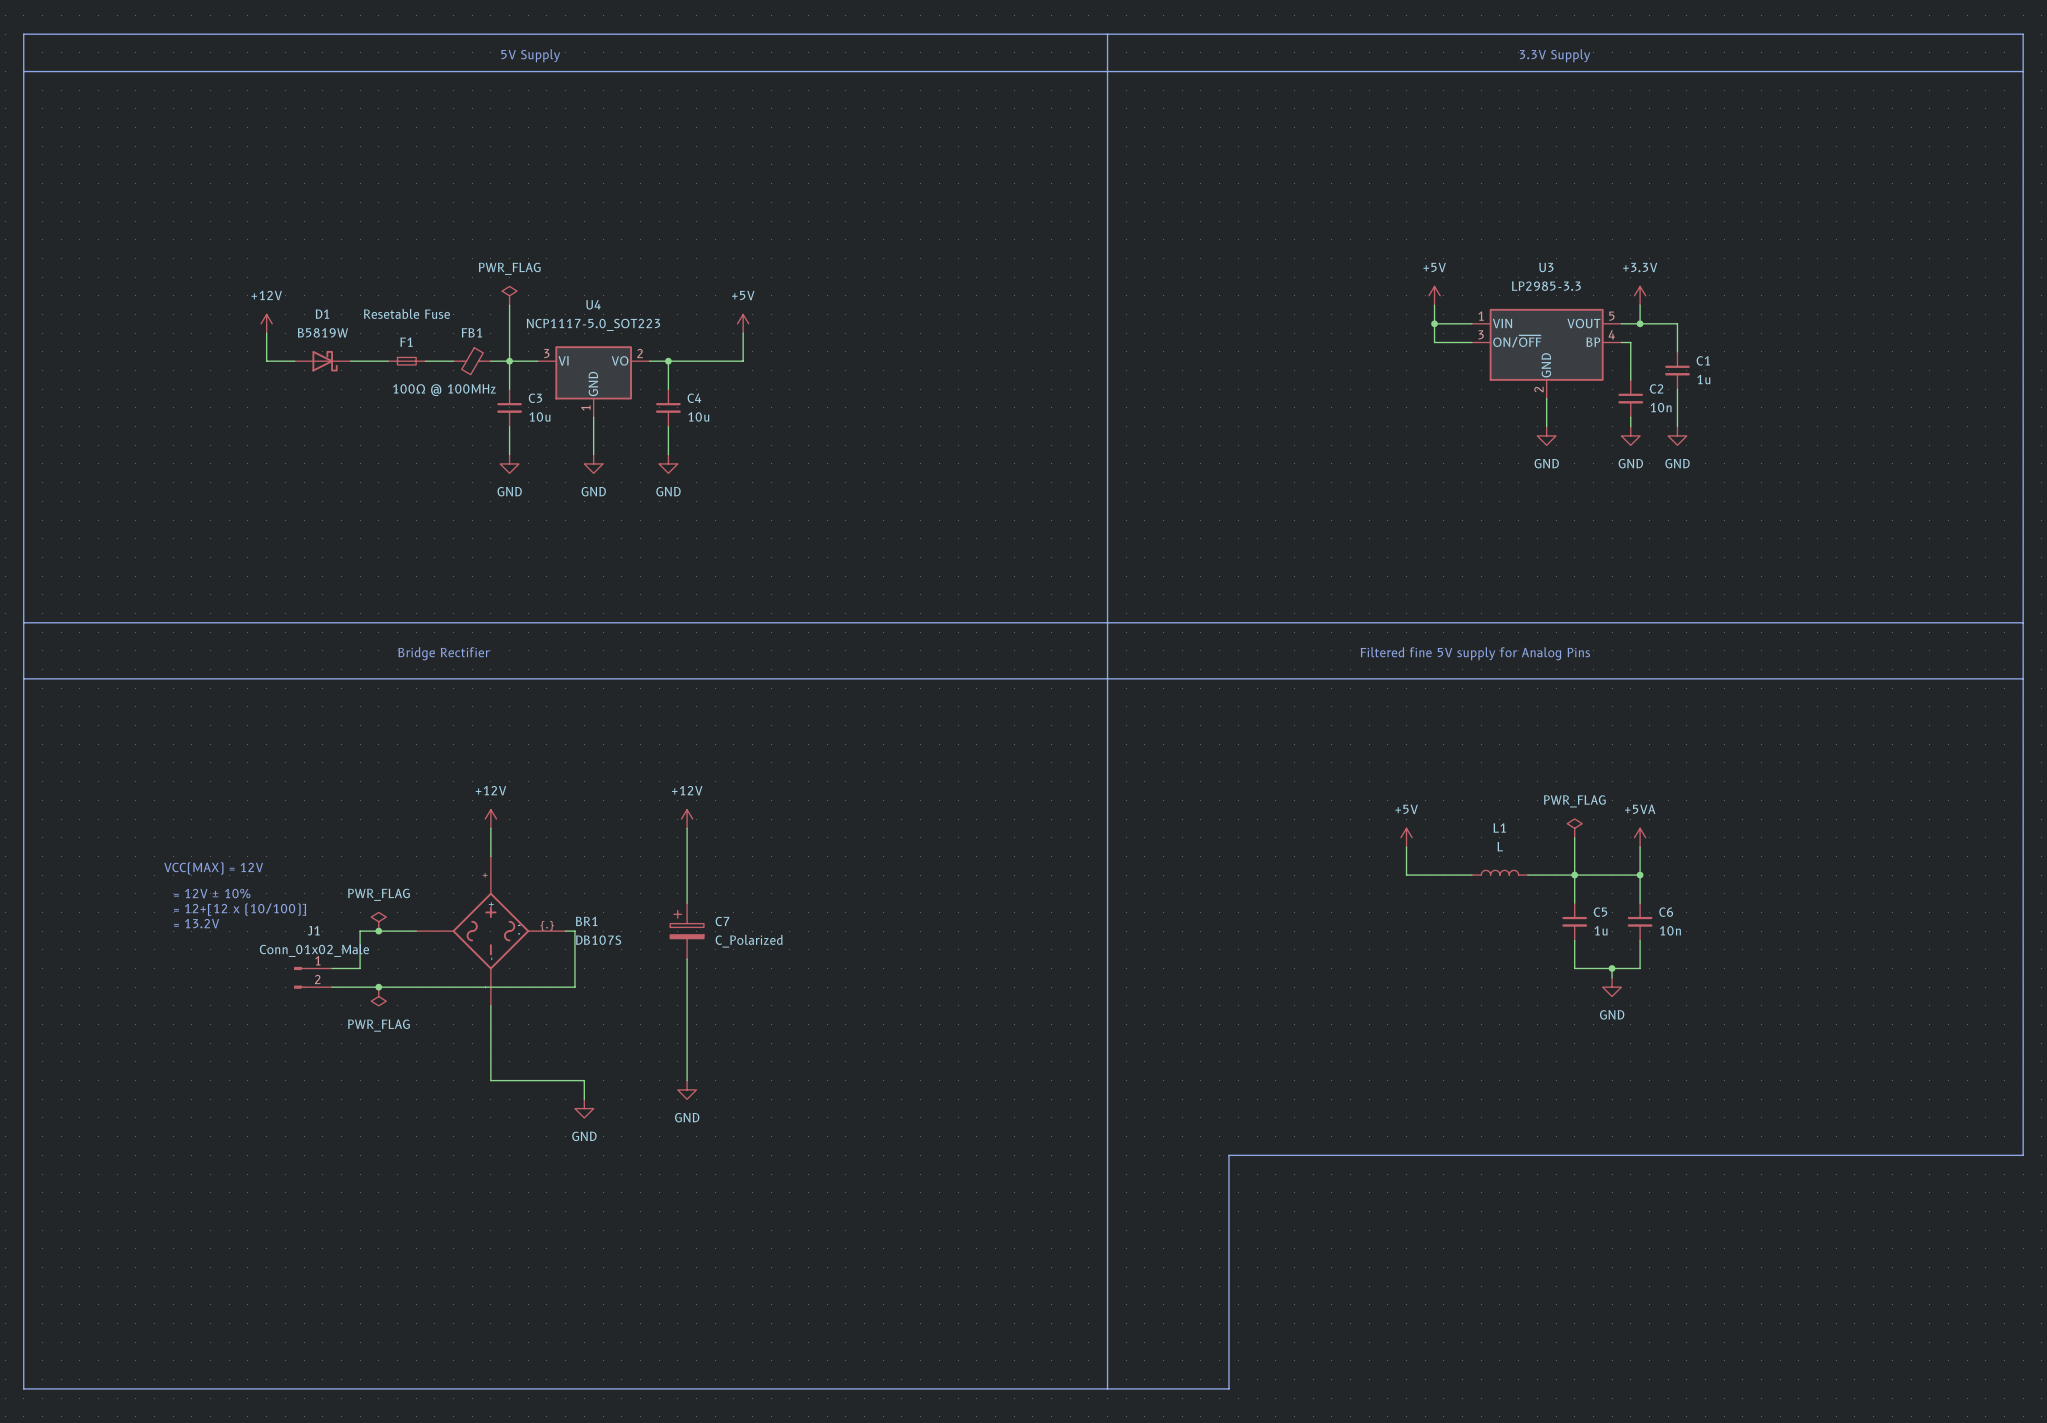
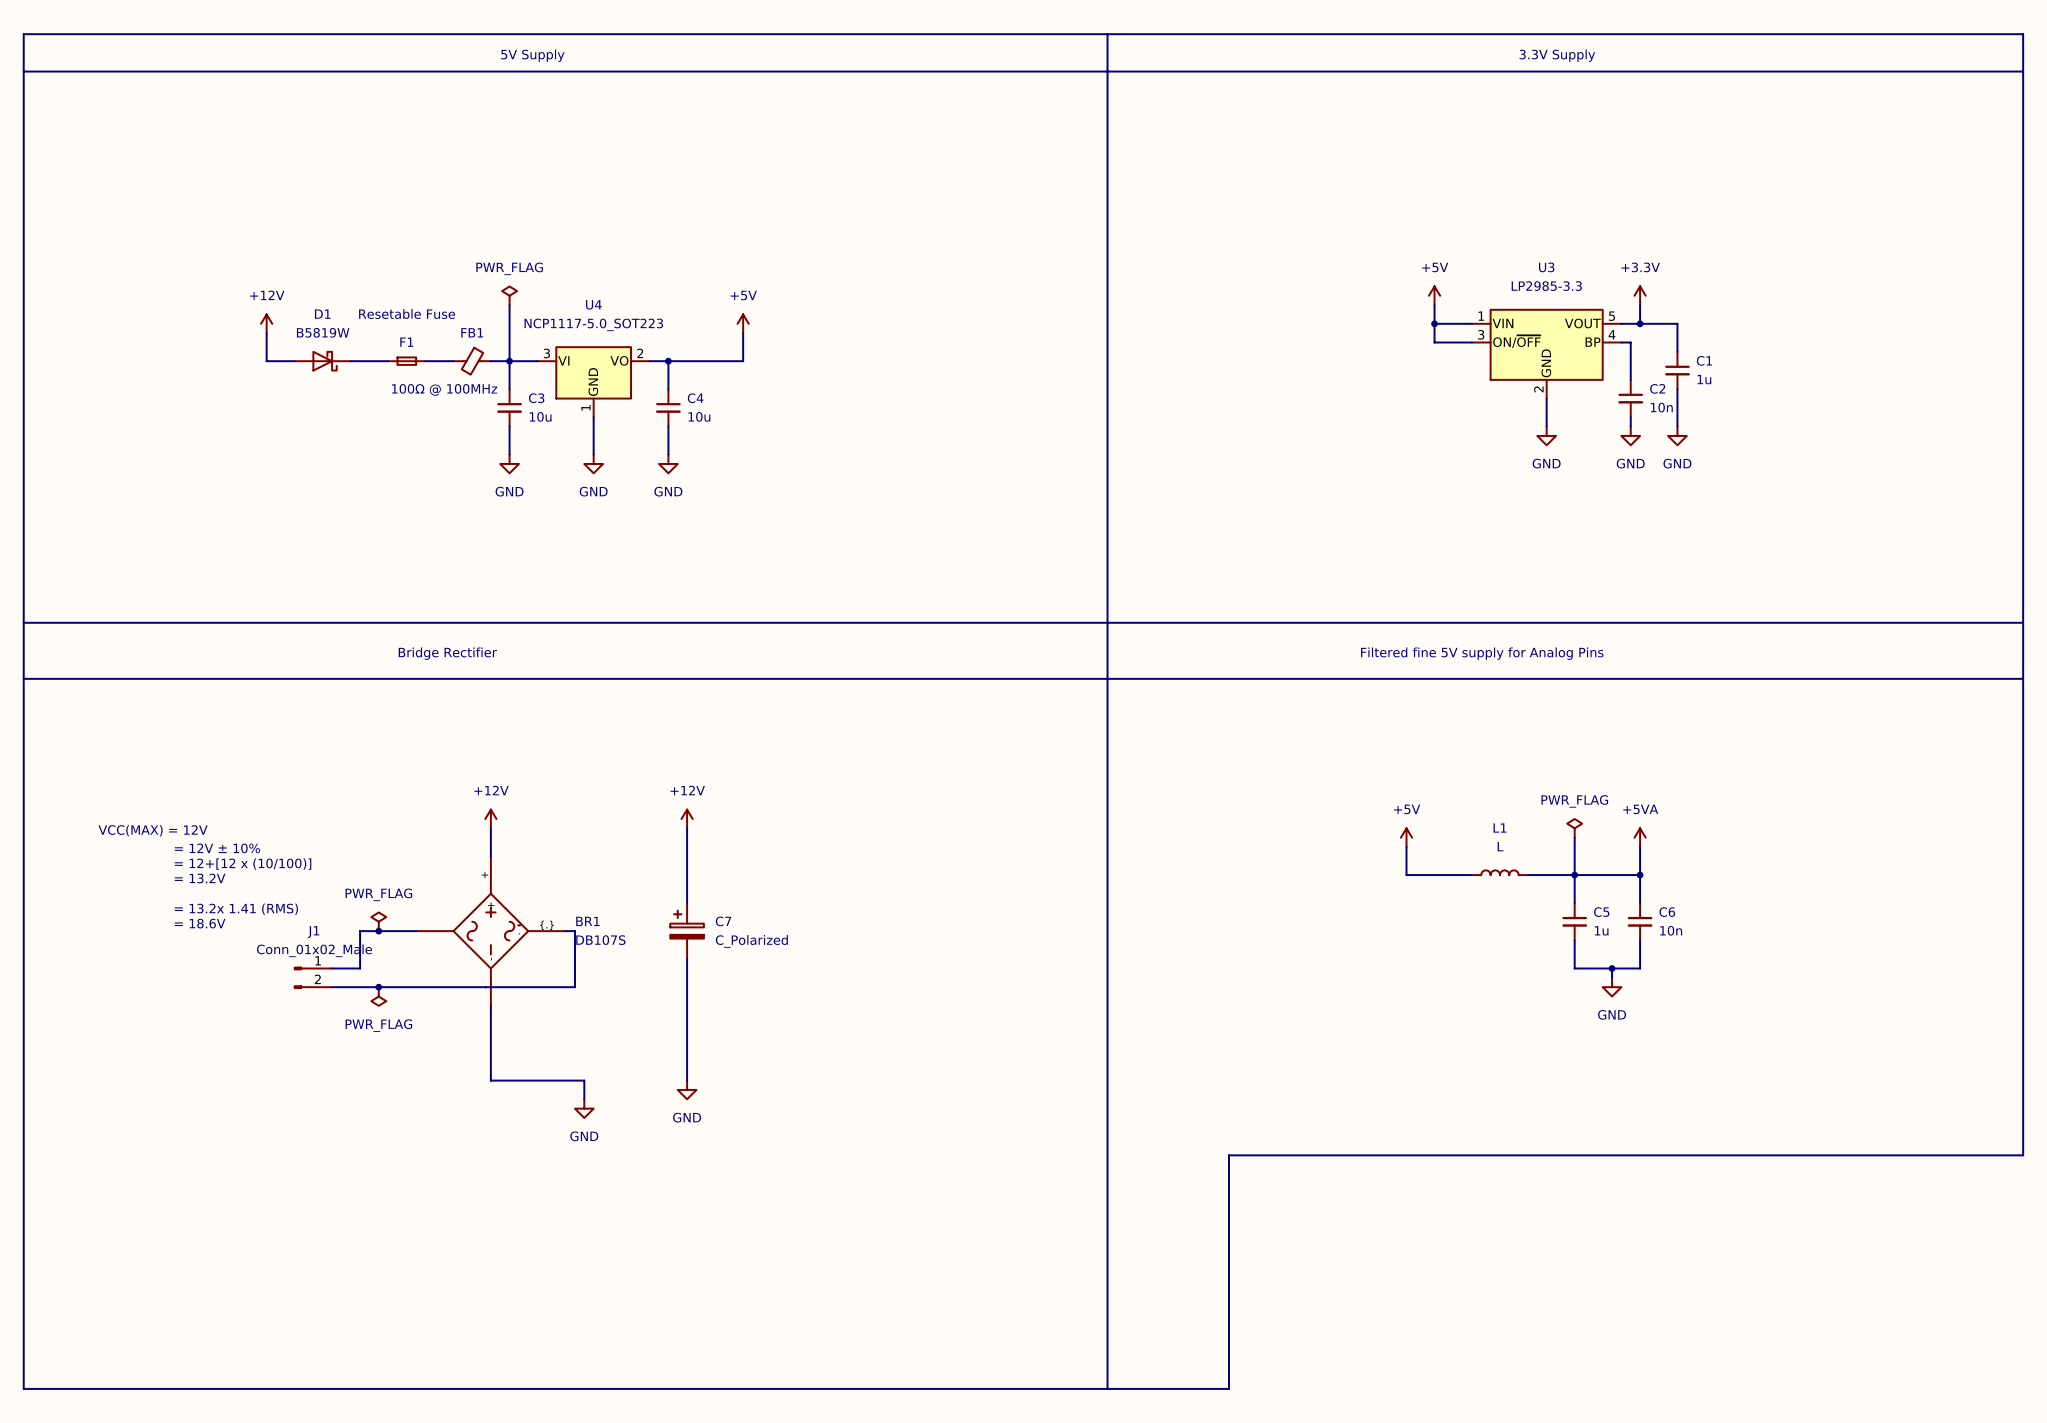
text: none -> = 12+[12 x (10/100)] (243, 864)
text position: VCC(MAX) = 12V (213, 868) -> VCC(MAX) = 12V (153, 830)
text: none -> = 13.2V (200, 878)
text position: = 12V ± 10% (212, 893) -> = 12V ± 10% (217, 848)
text: = 12+[12 x (10/100)] (240, 909) -> = 13.2x 1.41 (RMS) (236, 909)
text: = 13.2V (196, 923) -> = 18.6V (200, 923)

